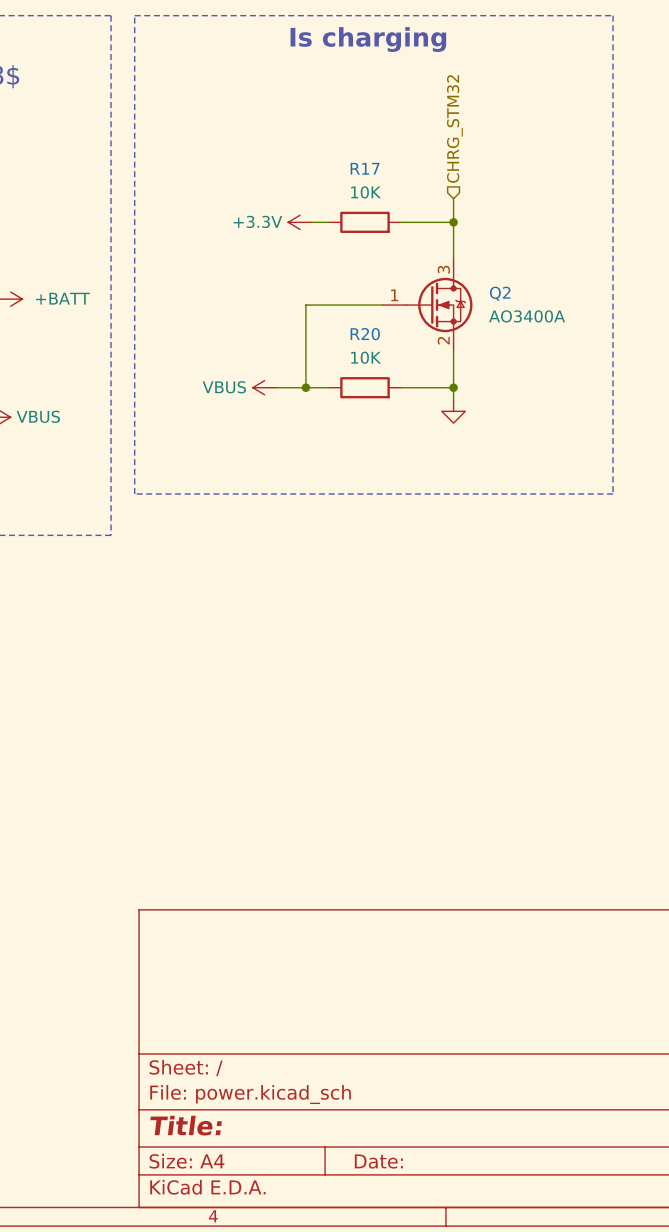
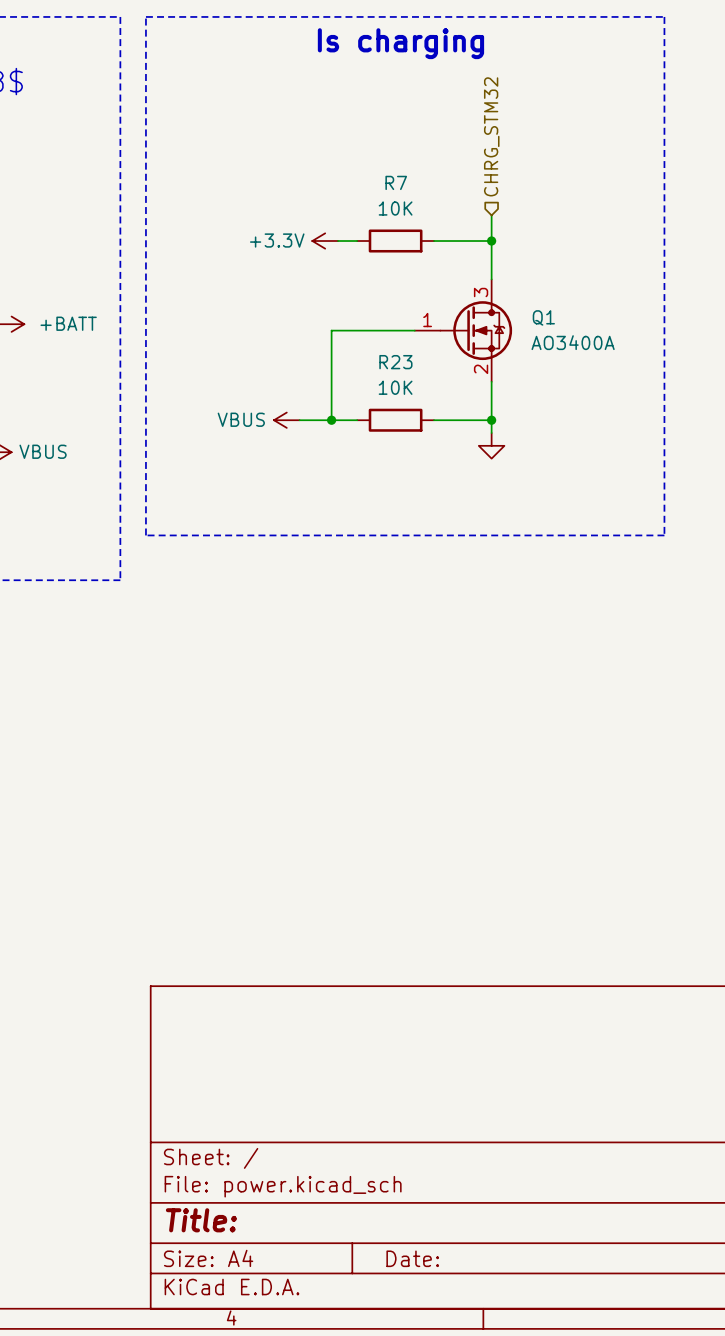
R17 name: R17 (365, 168) -> R7 (396, 182)
Q2 name: Q2 (500, 293) -> Q1 (543, 317)
R20 name: R20 (365, 334) -> R23 (395, 362)

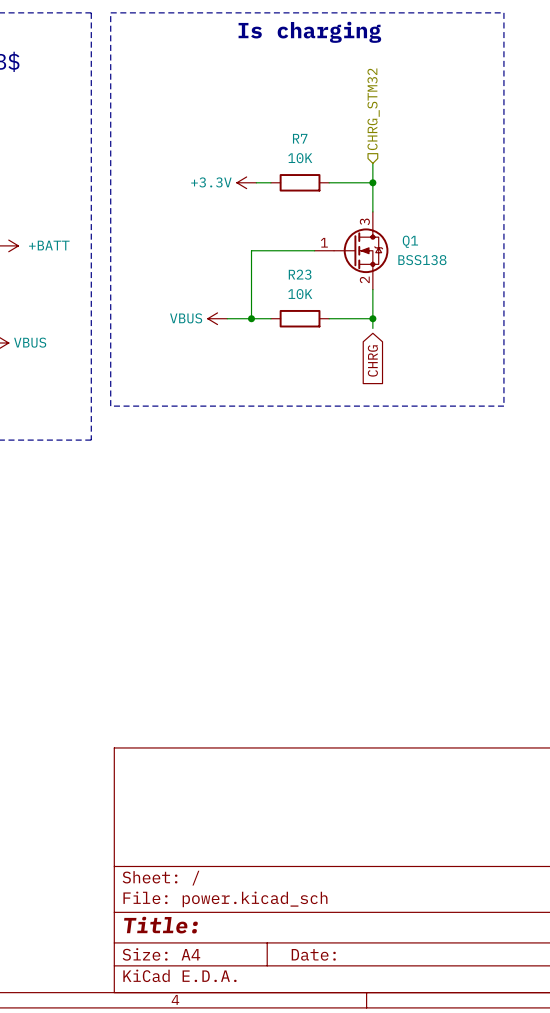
Q1 value: AO3400A (573, 342) -> BSS138 (422, 260)
power symbol: (491, 445) -> none
global label: none -> CHRG (372, 360)

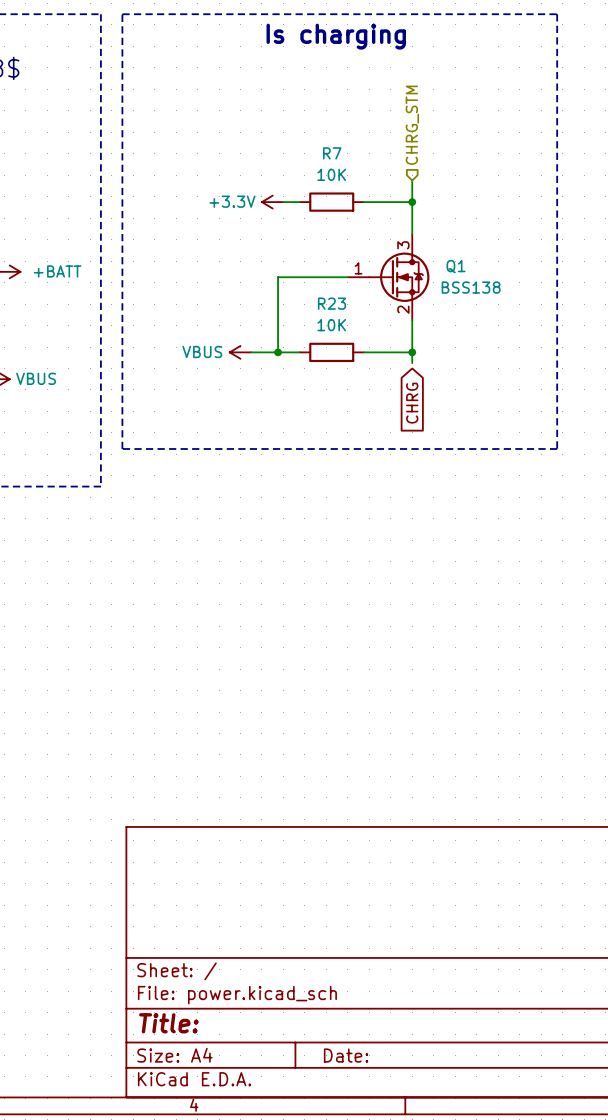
hierarchical label: CHRG_STM32 (373, 109) -> CHRG_STM (412, 125)

